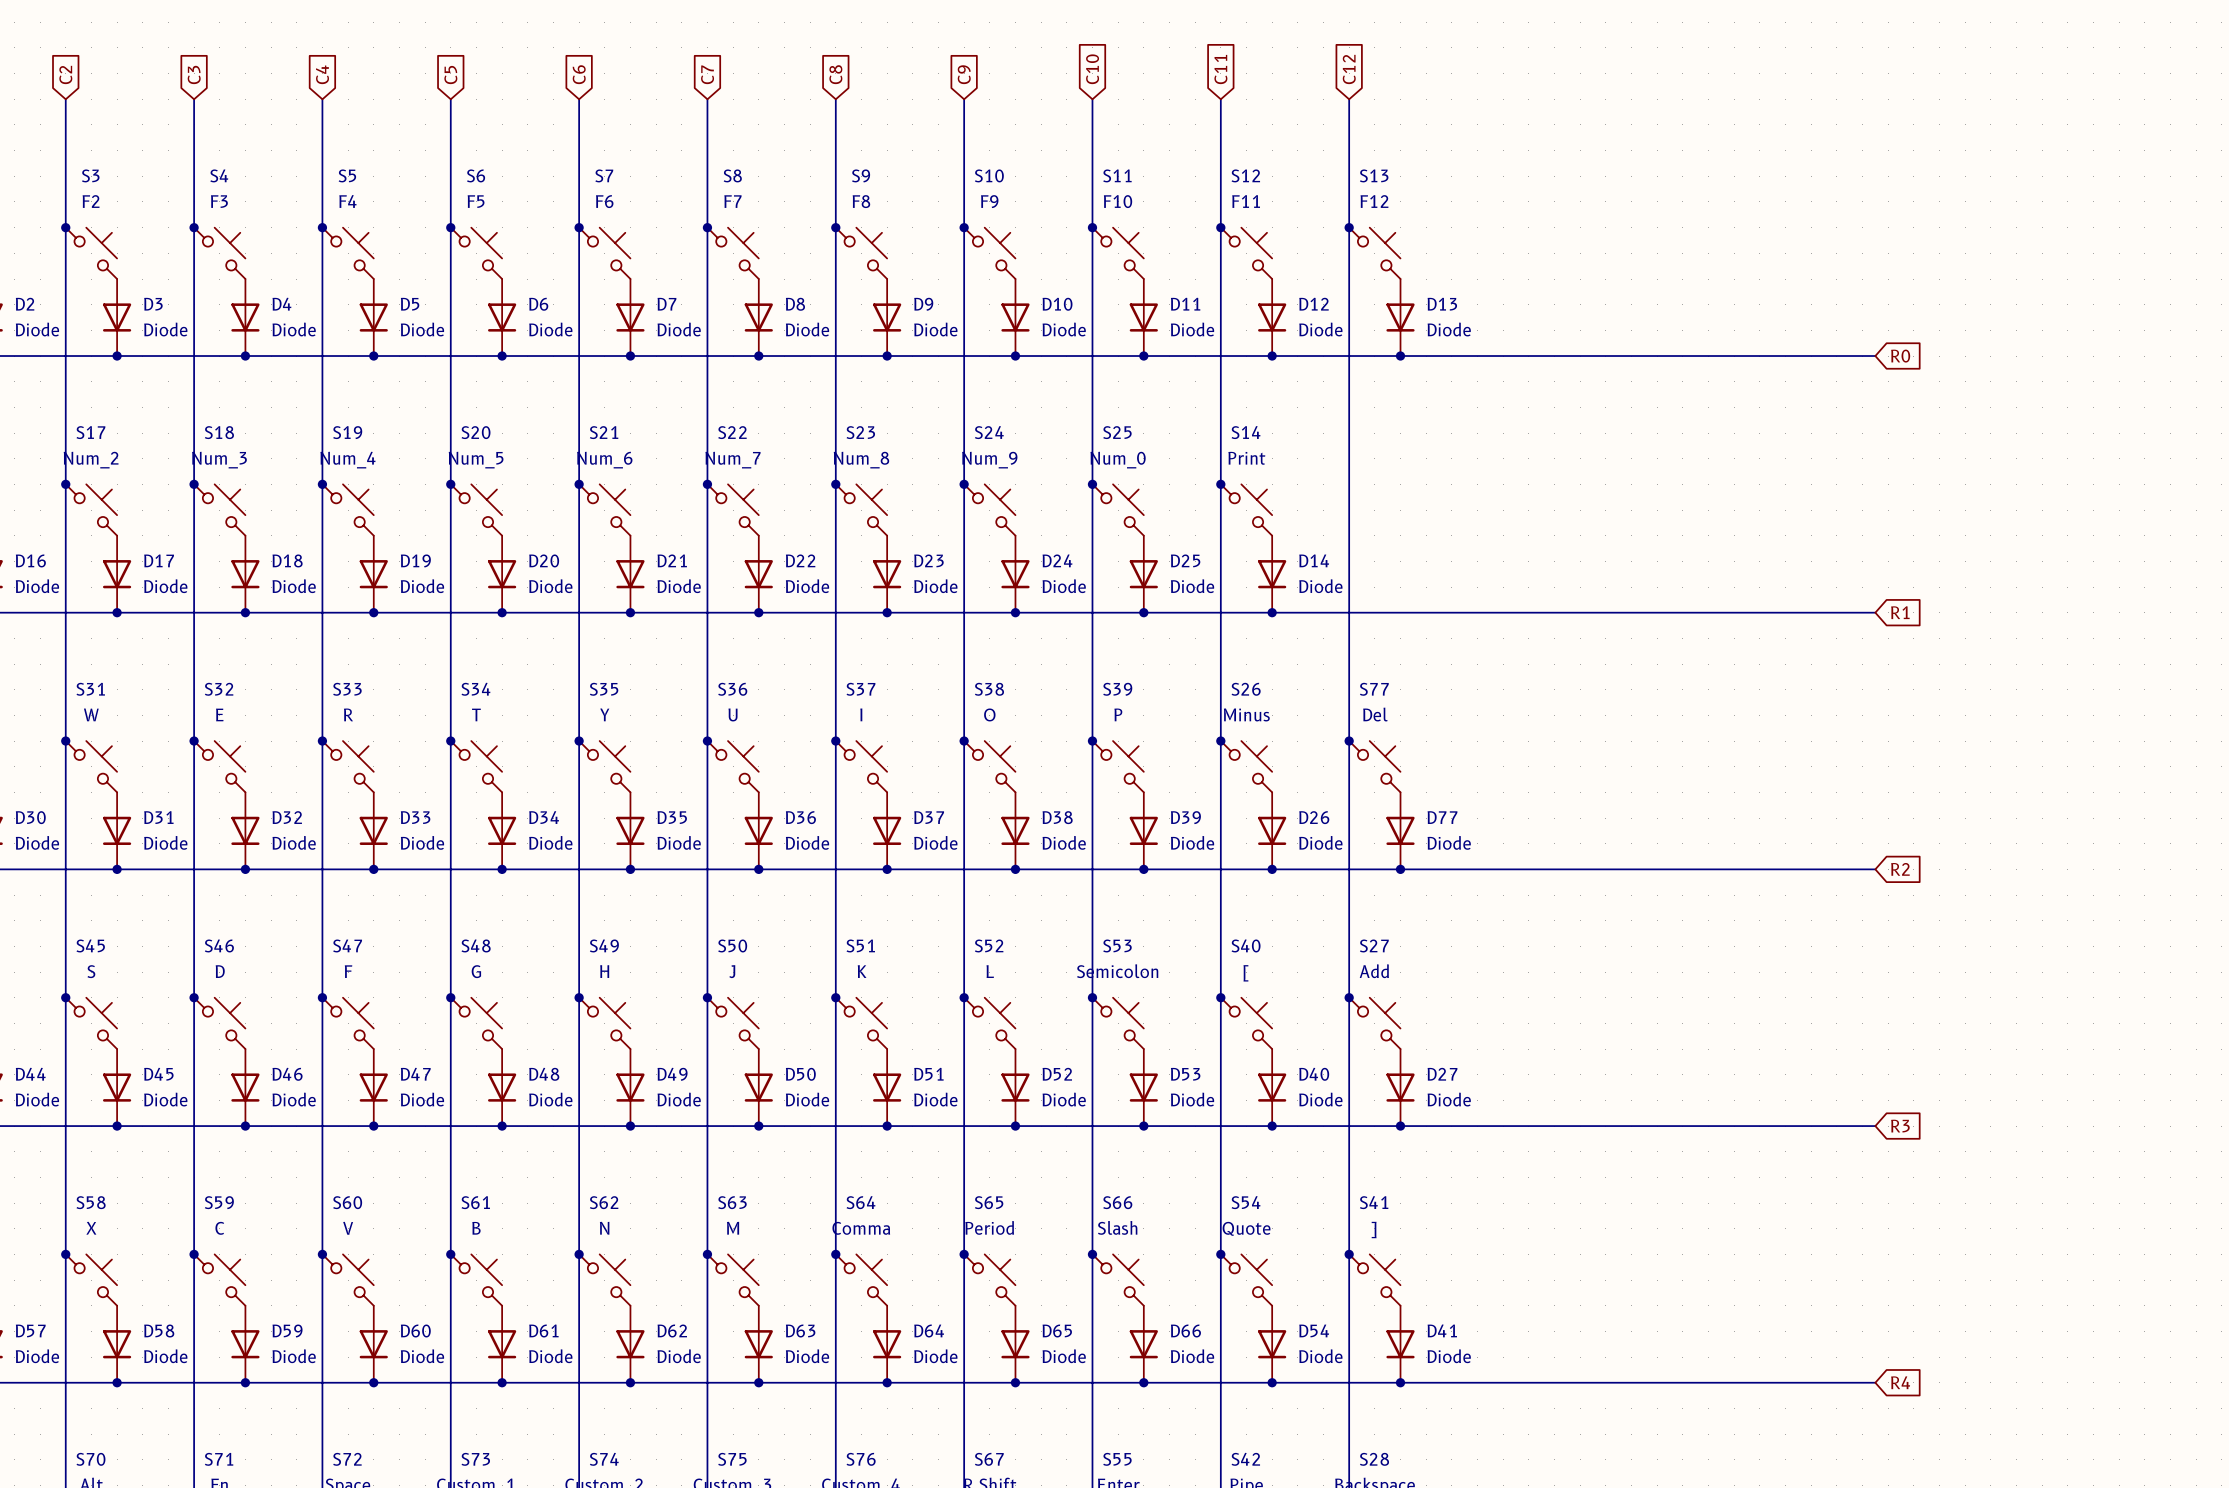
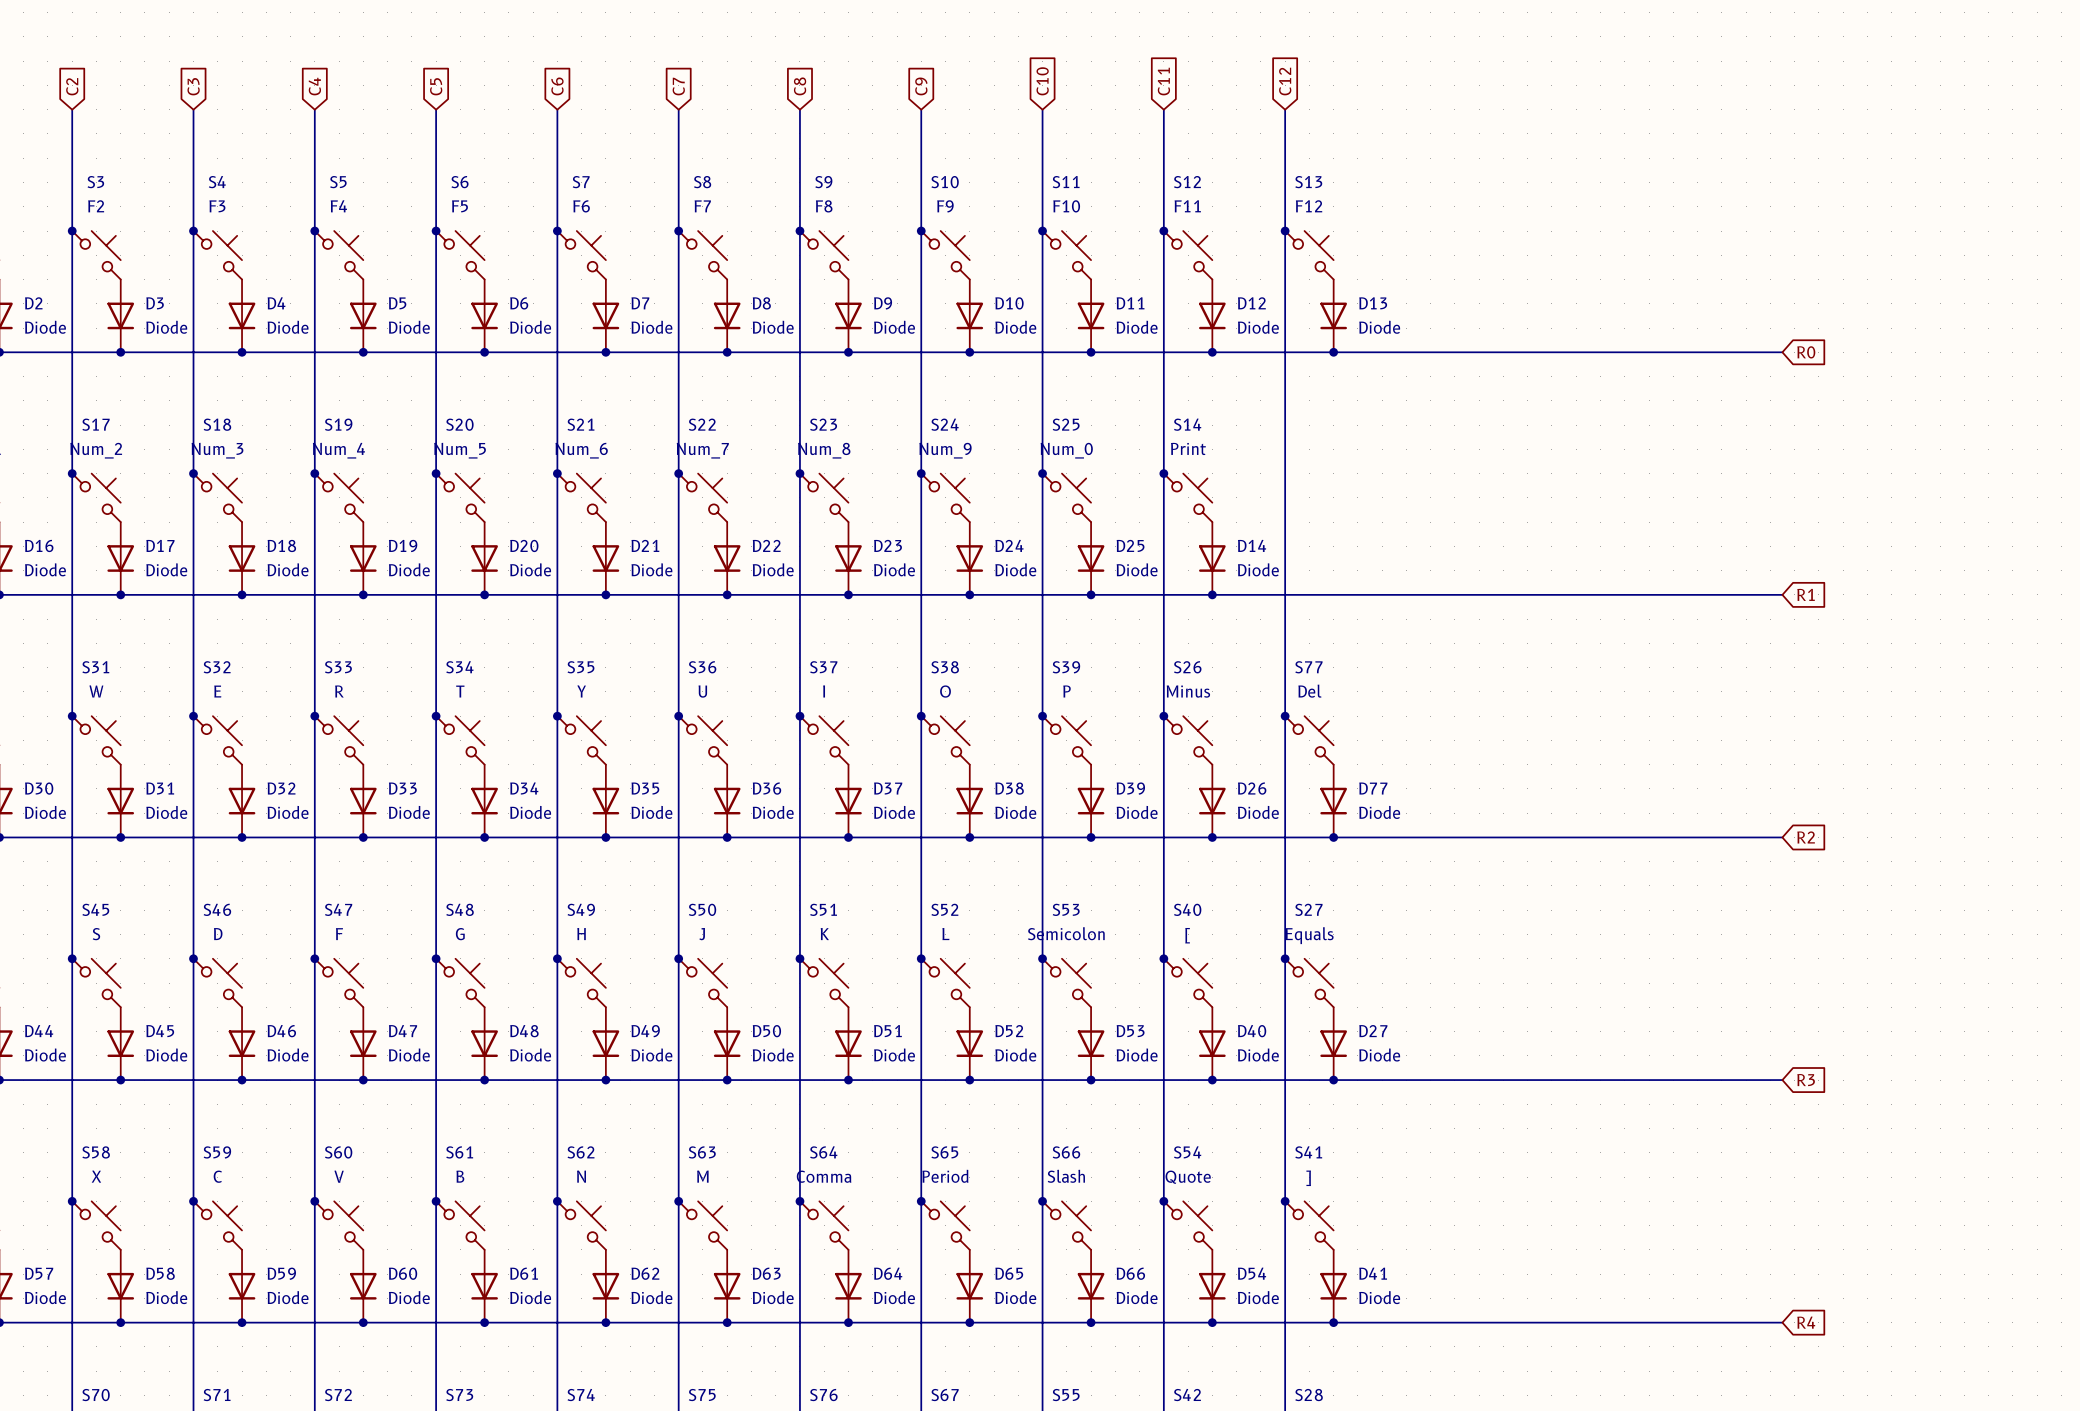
S27 value: Add (1374, 971) -> Equals (1309, 935)

